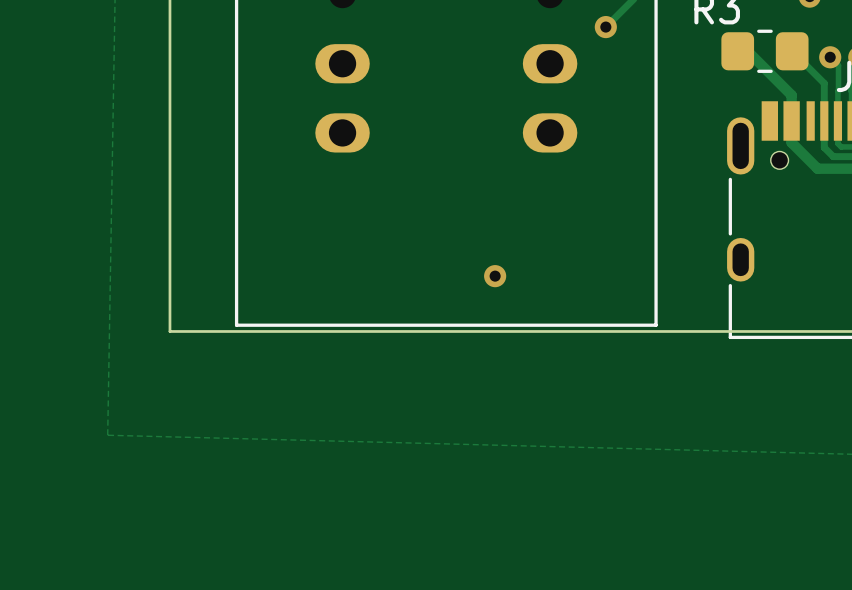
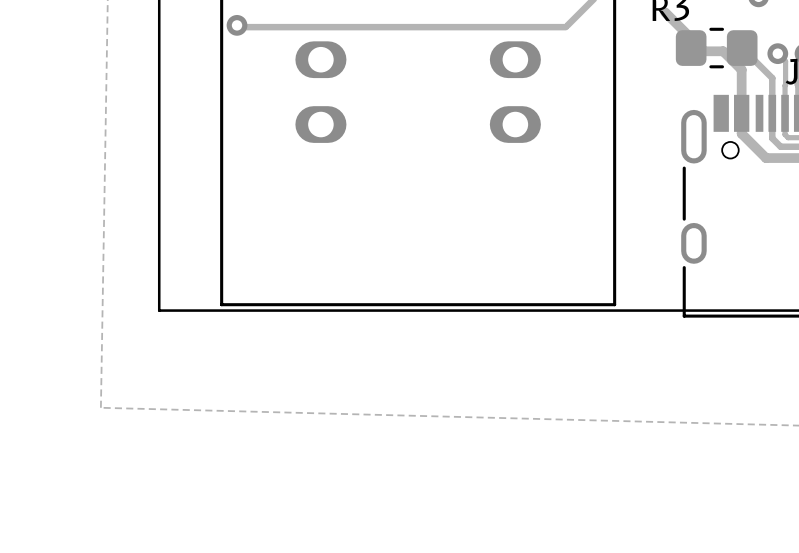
via: none -> (237, 25)
via: (605, 27) -> none
track: none -> (239, 27) (565, 27)
track: (747, 51) (791, 95) -> (665, 12) (704, 51) (723, 51) (741, 69) (741, 89)
via: (495, 276) -> none

